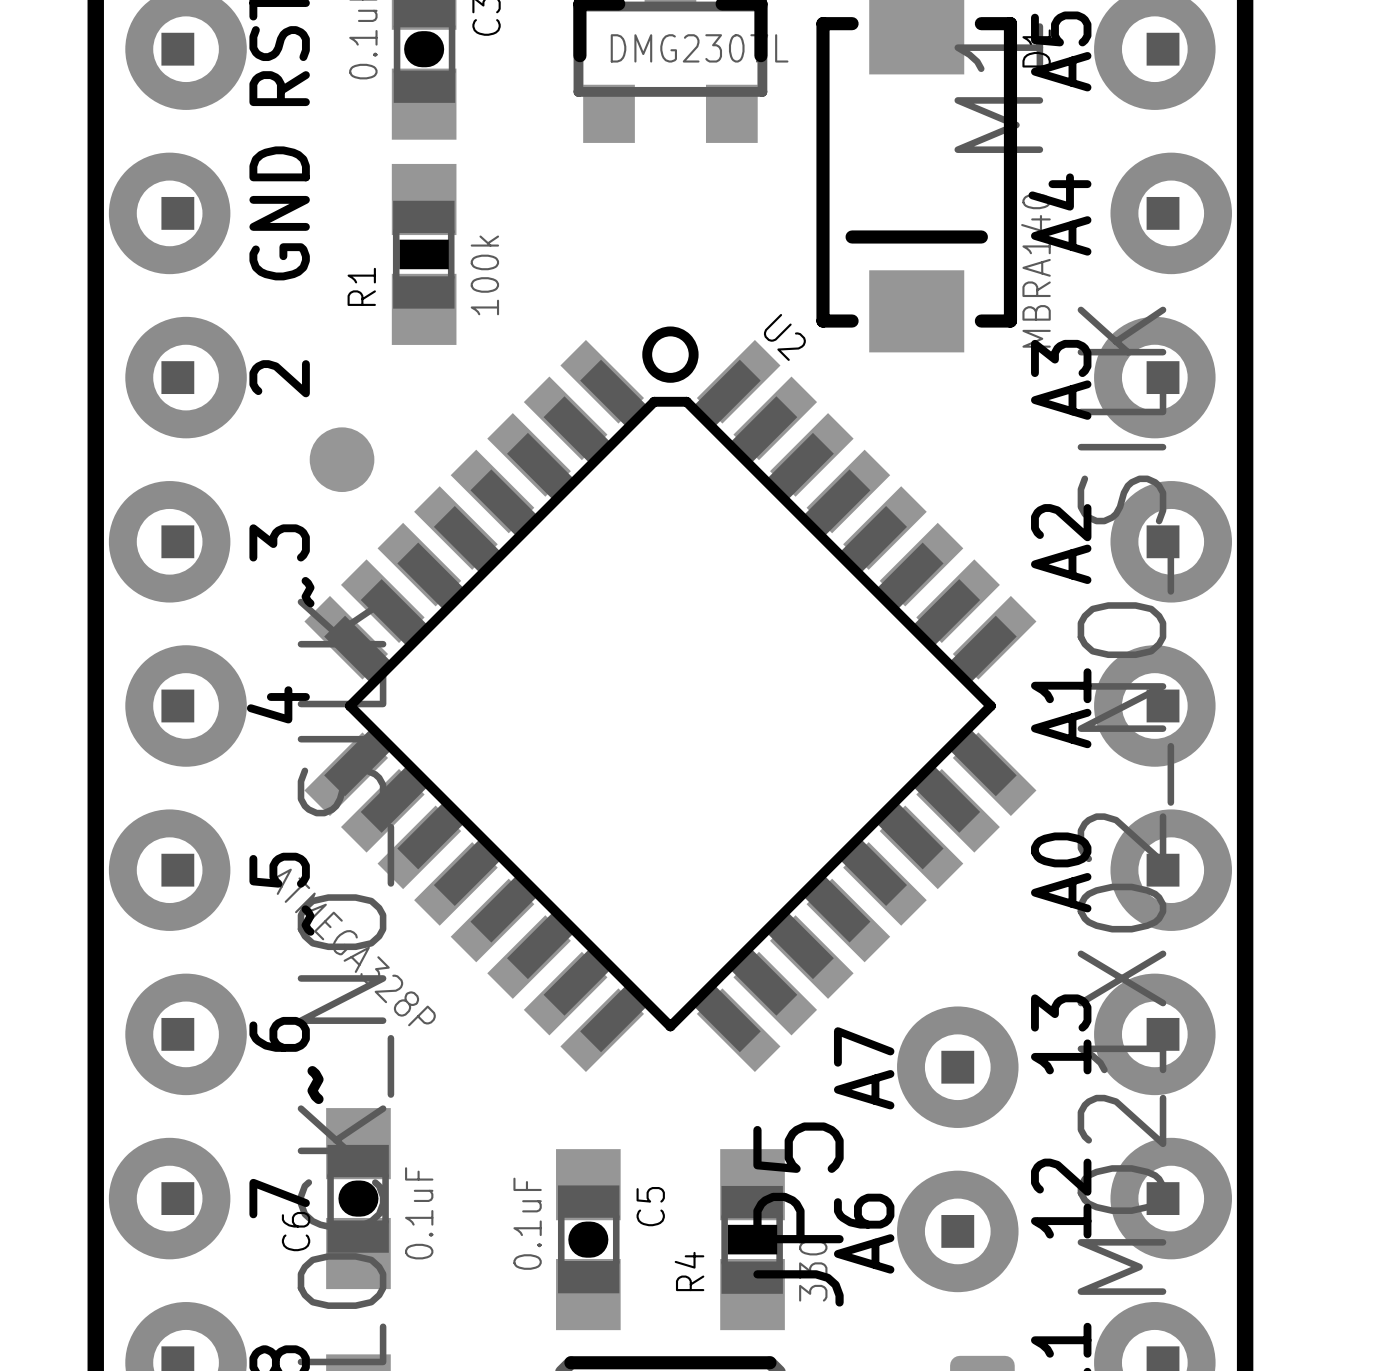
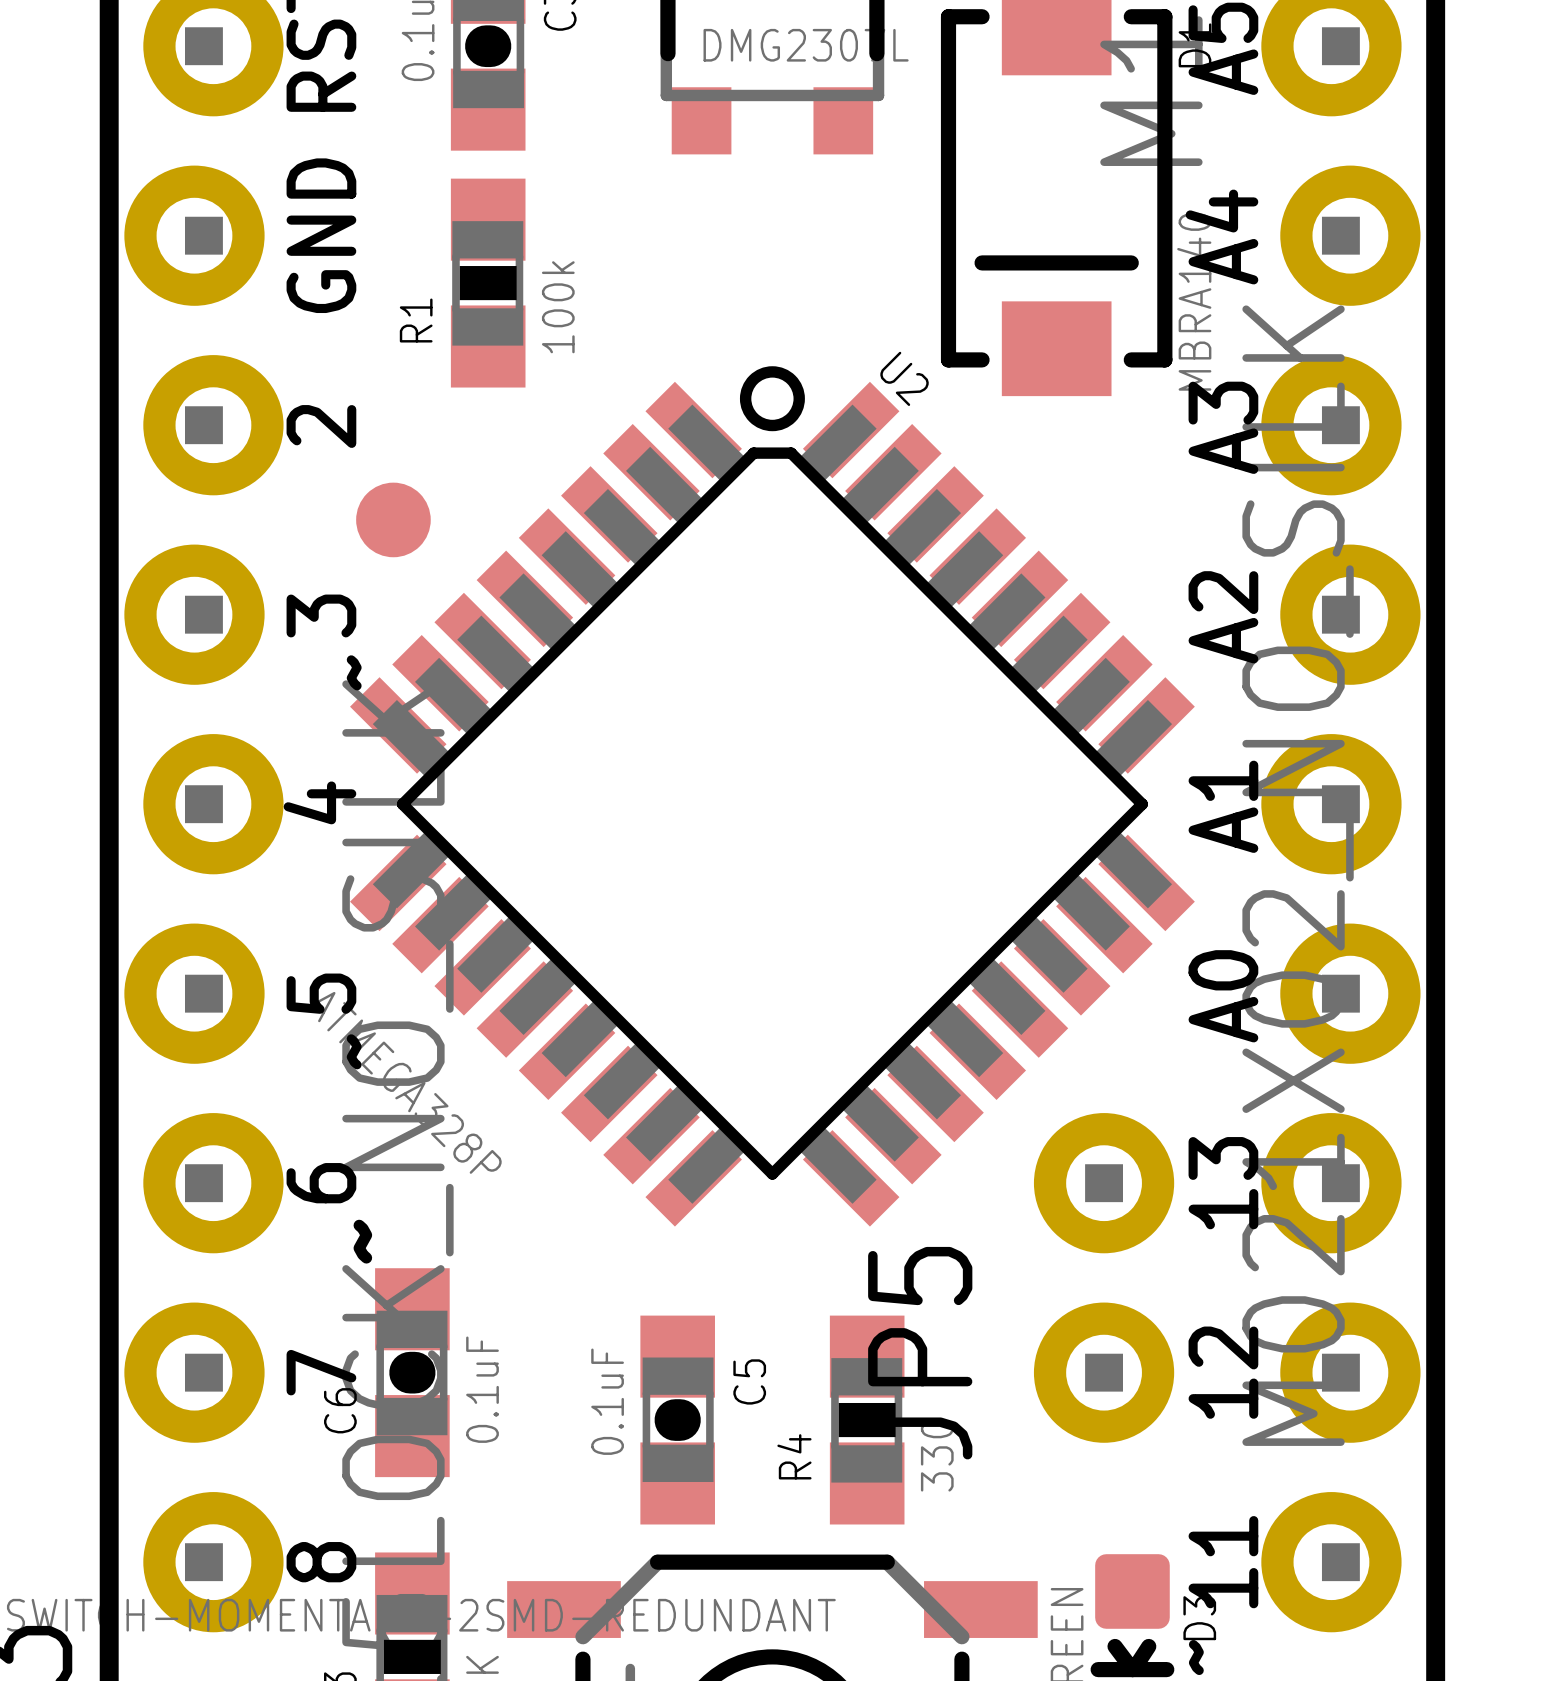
text: A7 (864, 1068) -> none
JP5 position: (957, 1149) -> (1104, 1277)
text: A6 (864, 1233) -> none

